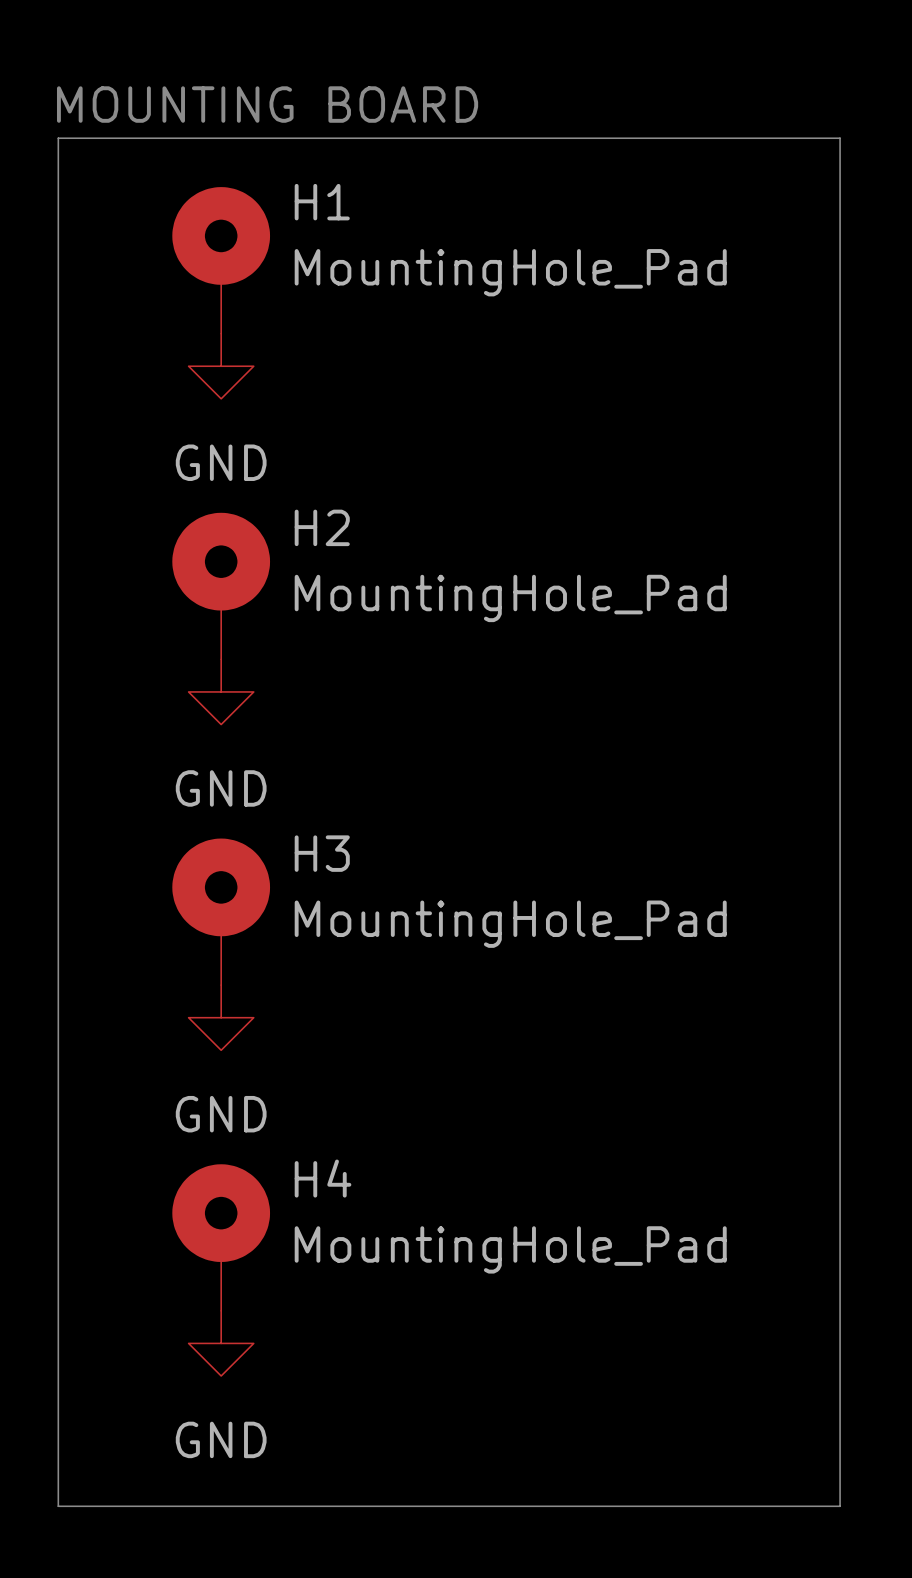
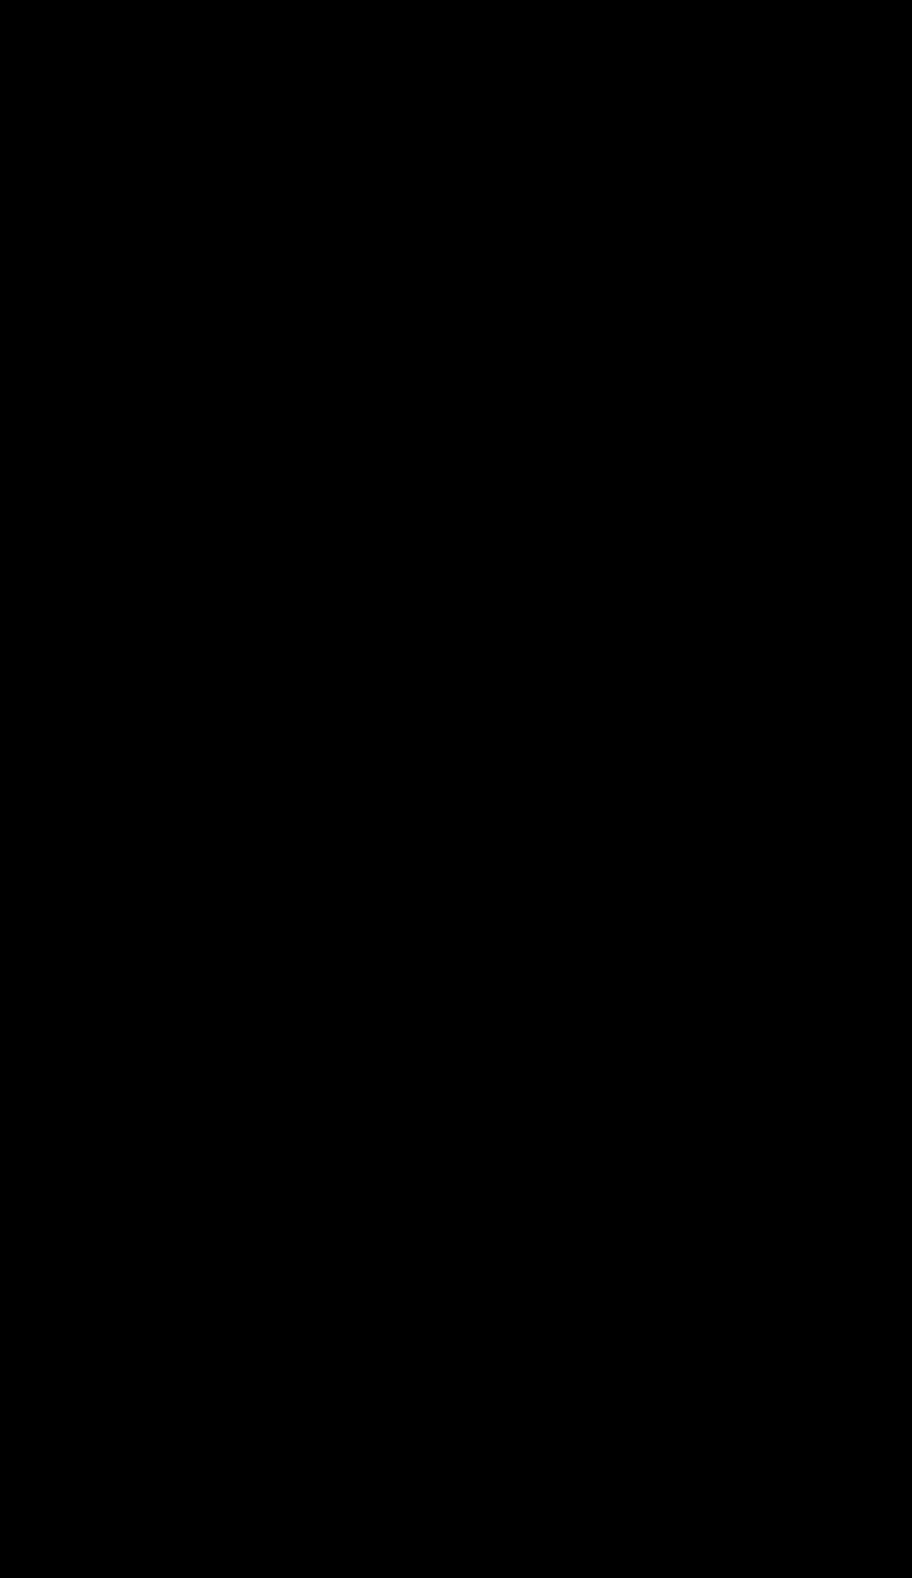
text: MOUNTING BOARD (267, 104) -> none
line: (58, 138) (840, 138) (840, 1506) (58, 1506) (58, 138) -> none
H1: MountingHole_Pad (221, 260) -> none
power symbol: GND (221, 366) -> none
H2: MountingHole_Pad (221, 586) -> none
power symbol: GND (221, 691) -> none
H3: MountingHole_Pad (221, 911) -> none
power symbol: GND (221, 1017) -> none
H4: MountingHole_Pad (221, 1237) -> none
power symbol: GND (221, 1343) -> none

